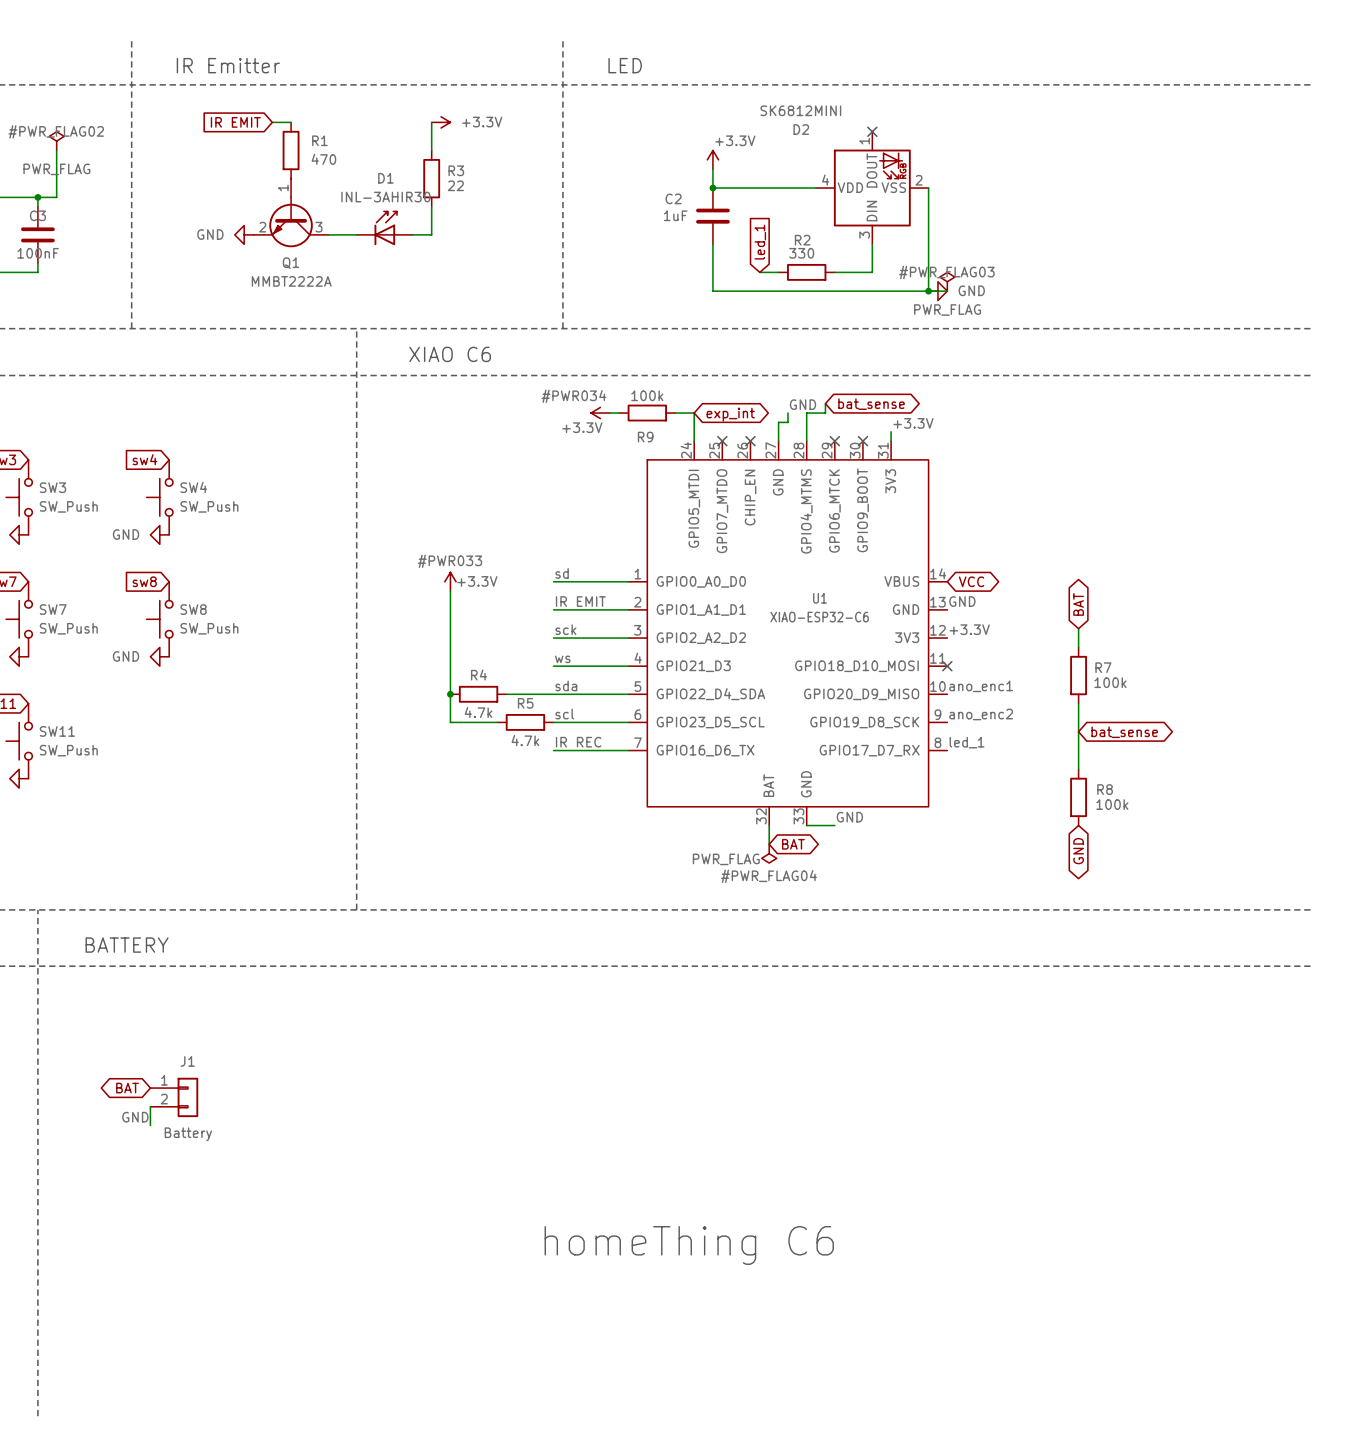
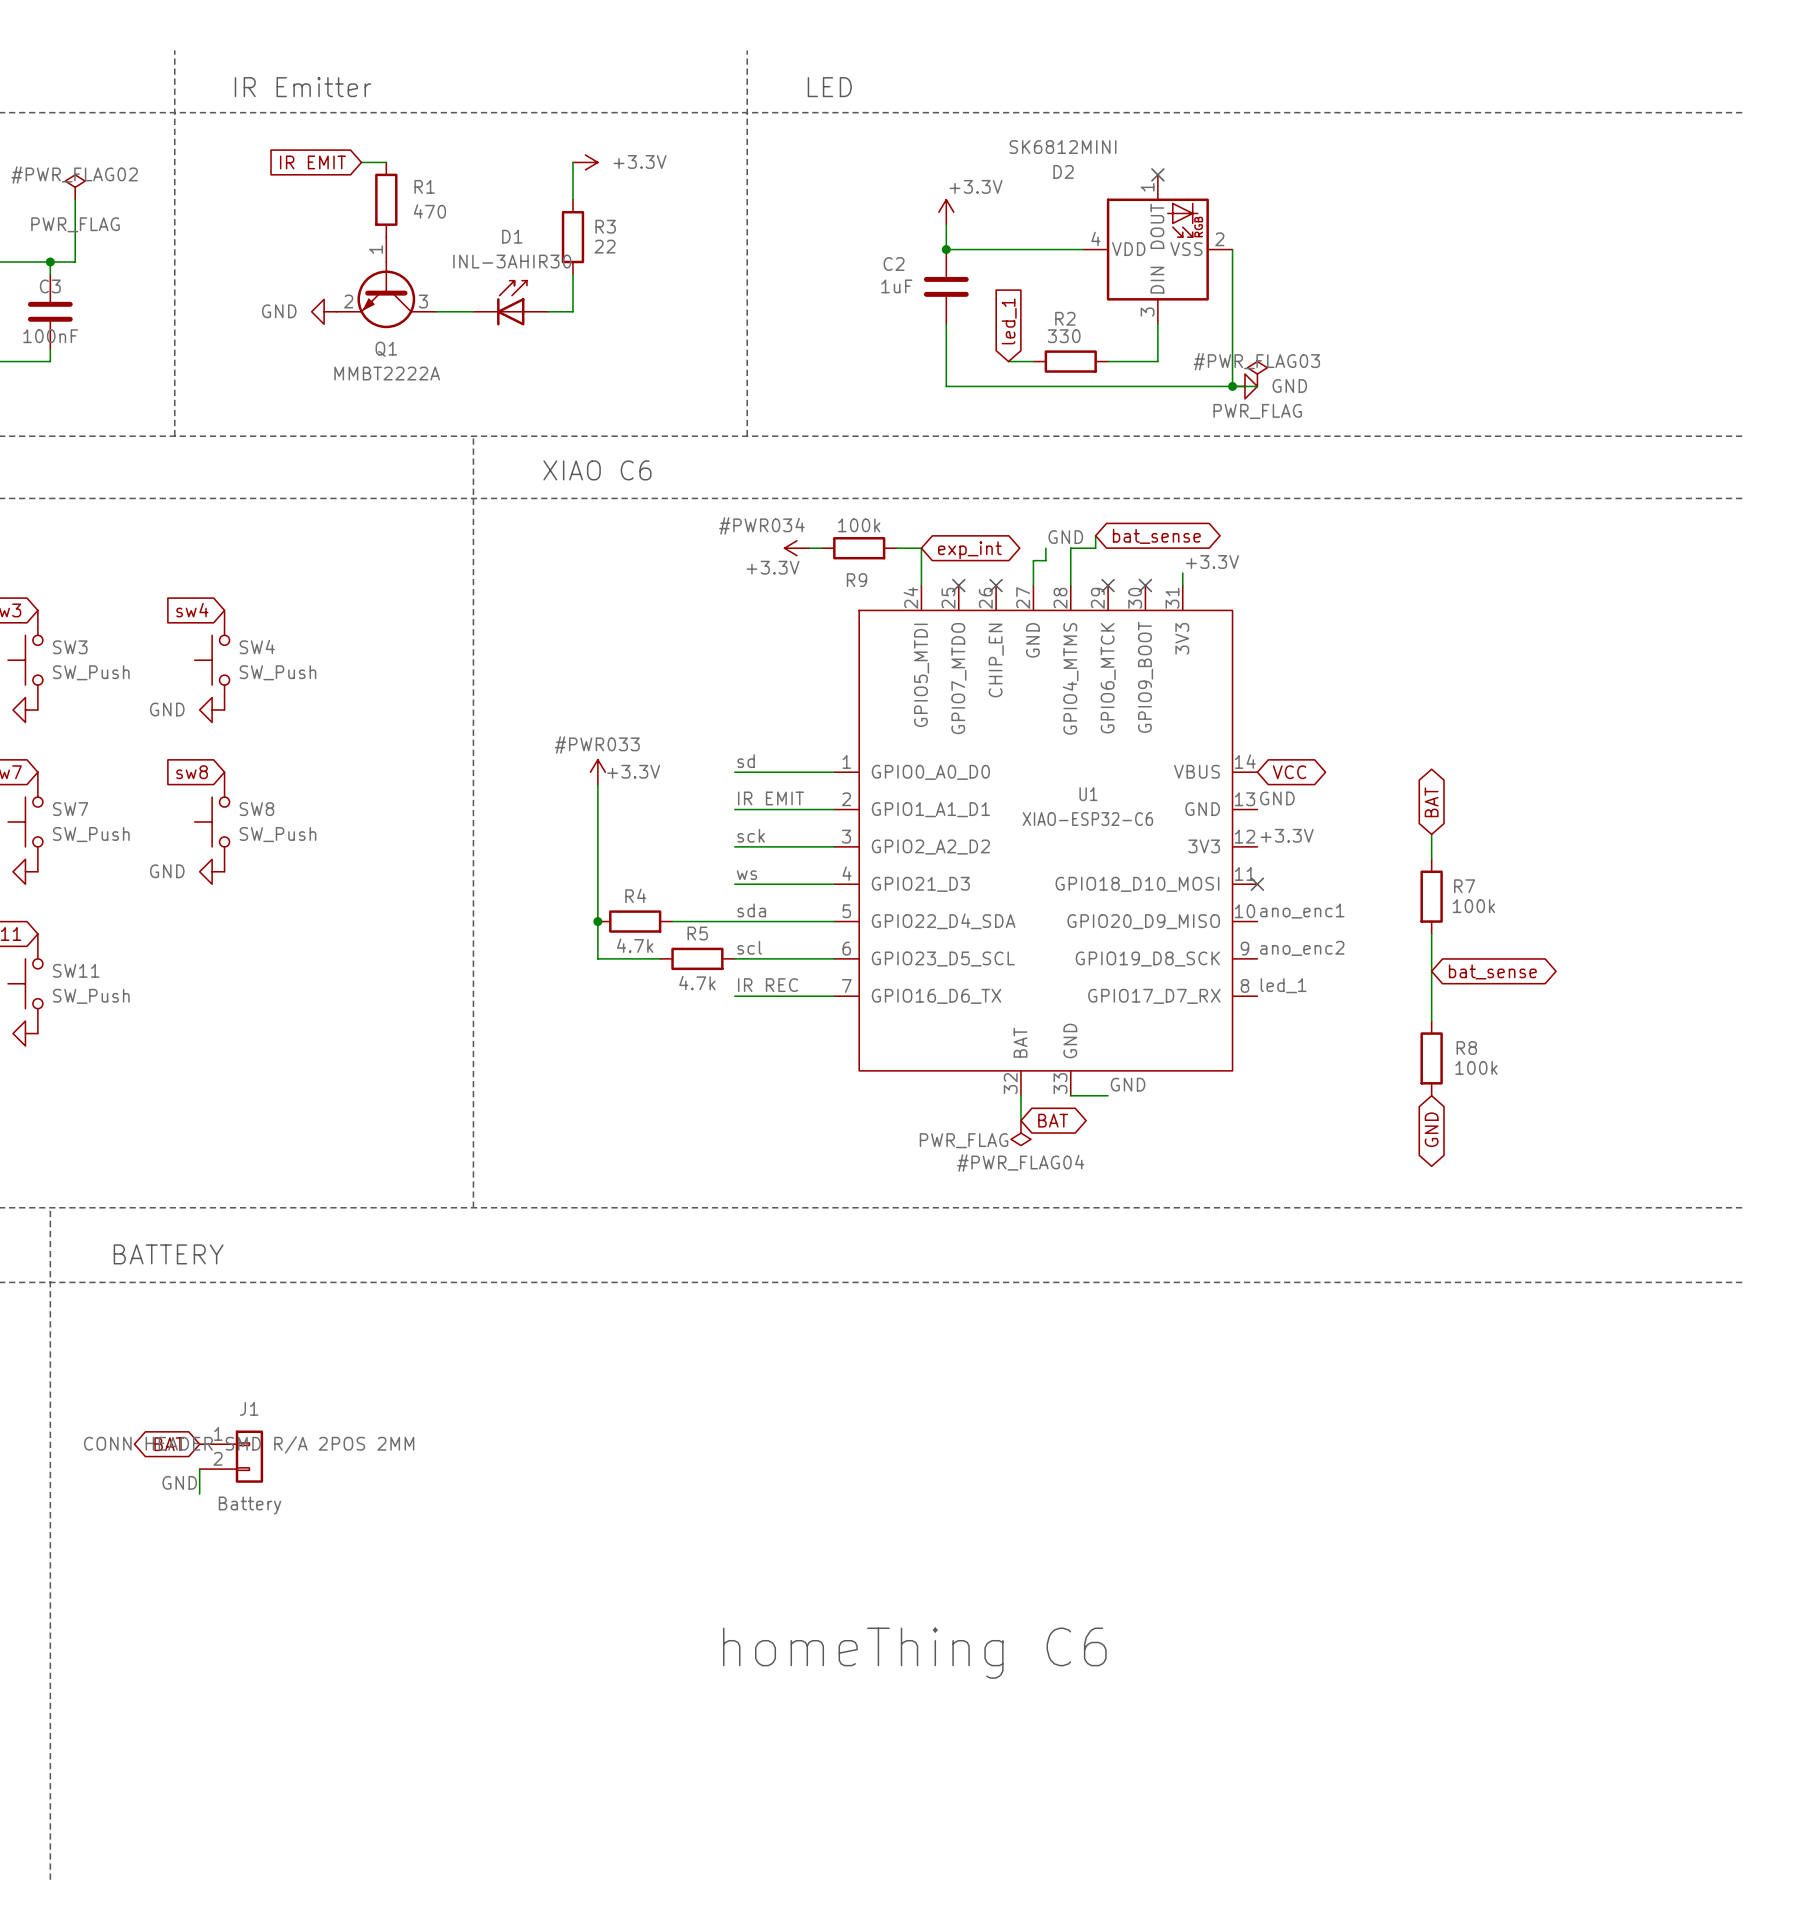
J1 text: none -> CONN HEADER SMD R/A 2POS 2MM (249, 1444)

